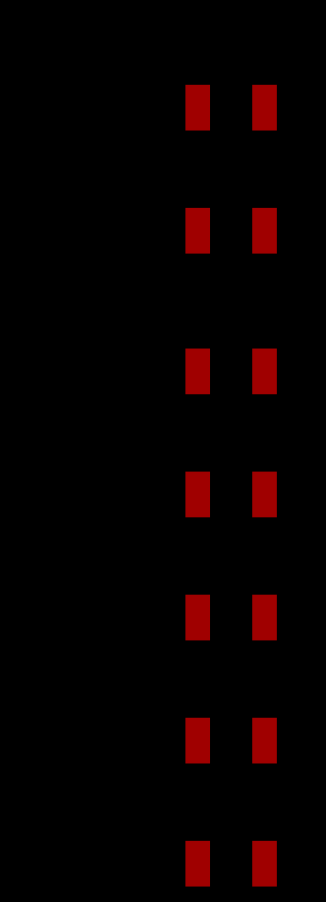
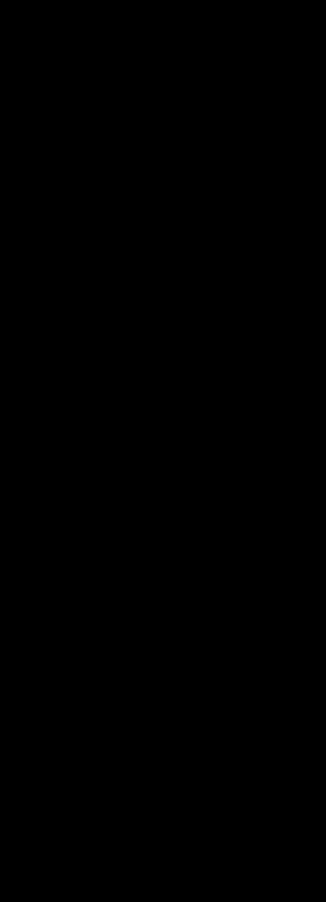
part: (231, 107) -> none
part: (231, 230) -> none
part: (231, 371) -> none
part: (231, 494) -> none
part: (231, 617) -> none
part: (231, 740) -> none
part: (231, 863) -> none

